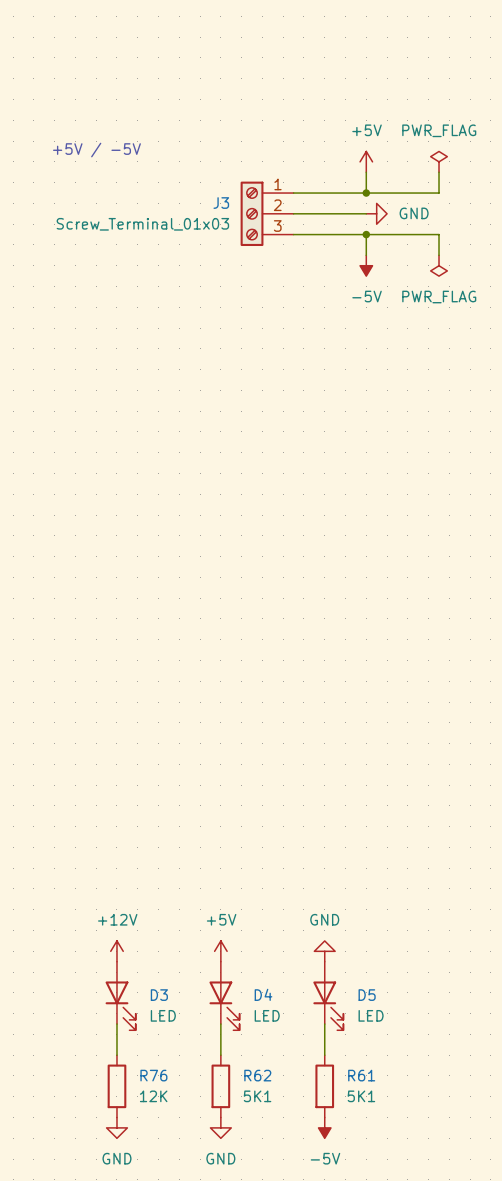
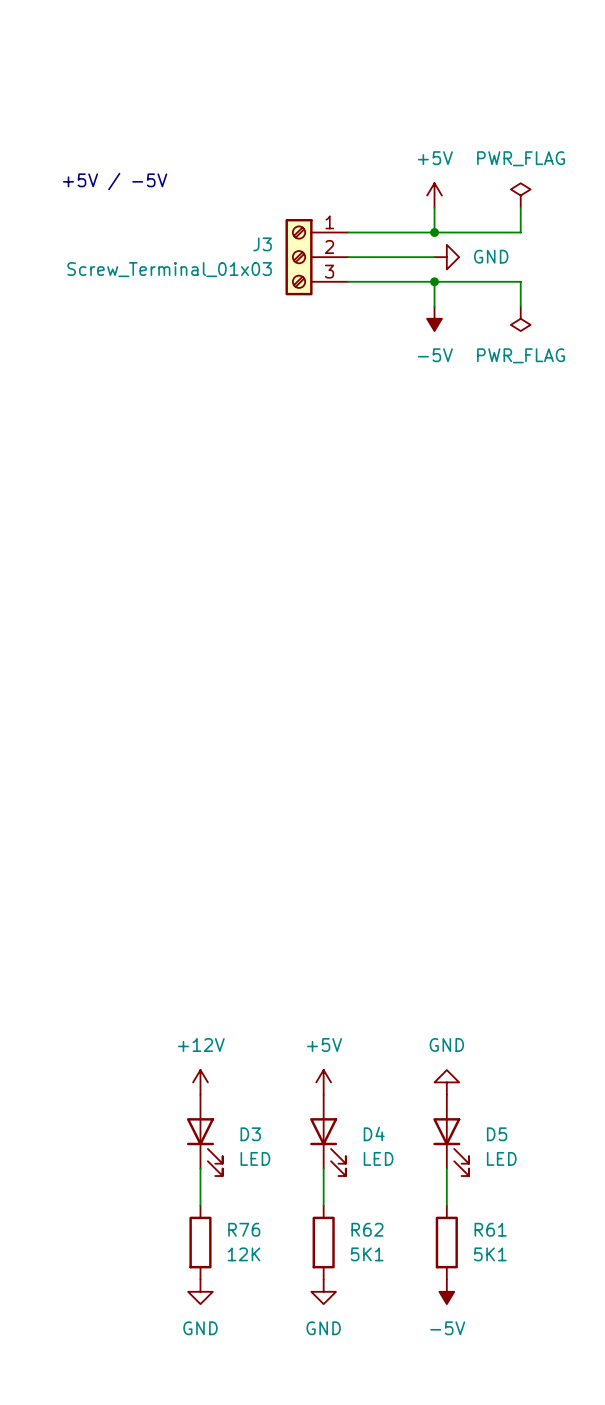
power symbol position: +12V (116, 951) -> +12V (200, 1082)
power symbol position: +5V (220, 951) -> +5V (323, 1082)
power symbol position: GND (324, 951) -> GND (446, 1082)
D3 position: (120, 995) -> (204, 1135)
D4 position: (224, 995) -> (327, 1135)
D5 position: (328, 995) -> (451, 1135)
wire: (116, 1024) (116, 1055) -> (200, 1168) (200, 1205)
wire: (220, 1024) (220, 1055) -> (323, 1168) (323, 1205)
wire: (324, 1024) (324, 1055) -> (446, 1168) (446, 1205)
R76 position: (116, 1086) -> (200, 1242)
power symbol: none -> GND (200, 1291)
R62 position: (220, 1086) -> (323, 1242)
power symbol: none -> GND (323, 1291)
R61 position: (324, 1086) -> (446, 1242)
power symbol: GND (116, 1127) -> none
power symbol: GND (220, 1127) -> none
power symbol position: -5V (324, 1127) -> -5V (446, 1291)

